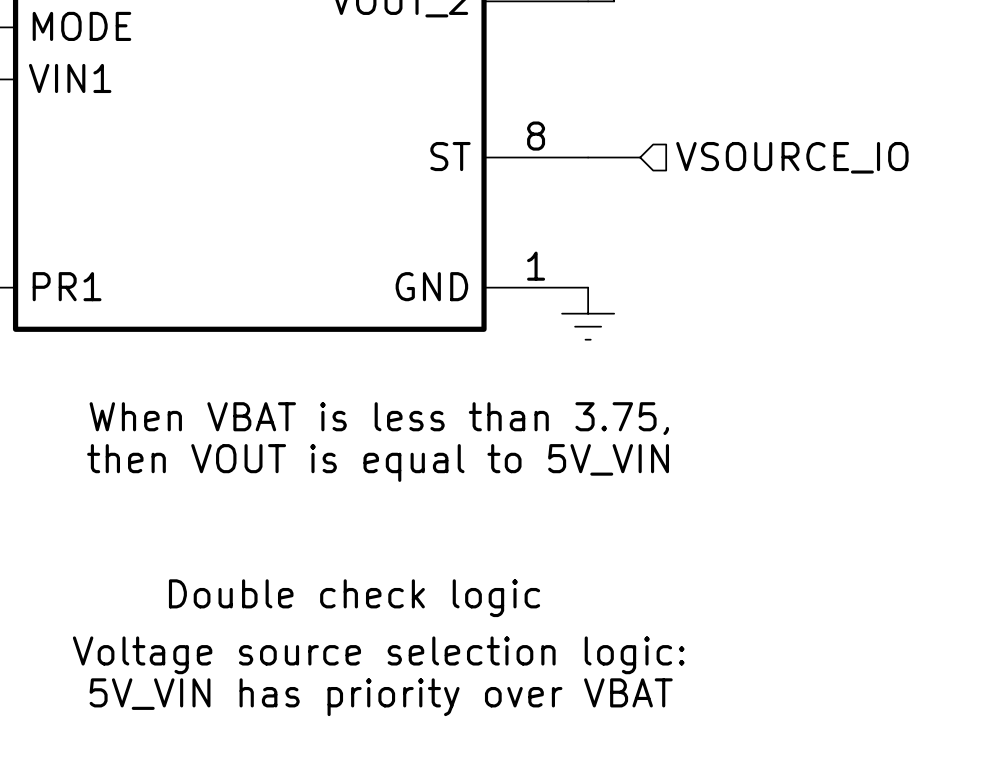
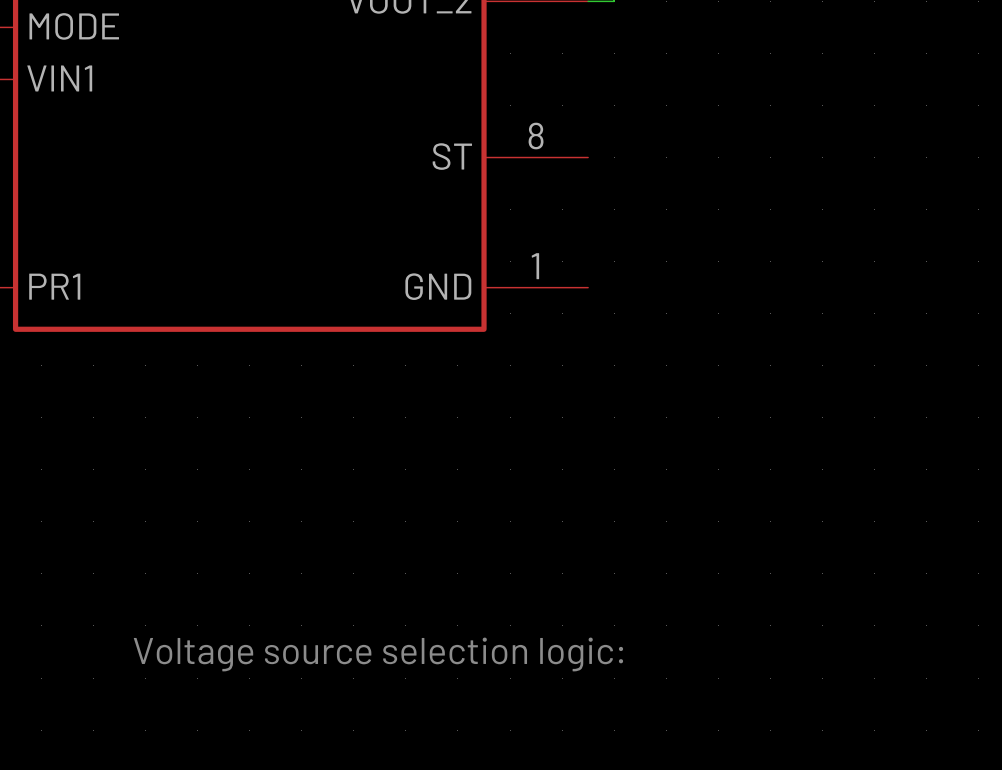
wire: (588, 157) (640, 157) -> none
hierarchical label: VSOURCE_IO (792, 157) -> none
power symbol: (588, 313) -> none
text: When VBAT is less than 3.75, (379, 418) -> none
text: then VOUT is equal to 5V_VIN (378, 462) -> none
text: Double check logic (354, 598) -> none
text: 5V_VIN has priority over VBAT (381, 697) -> none

